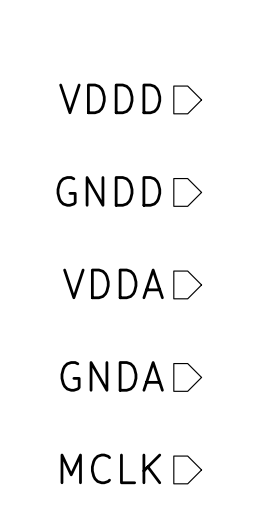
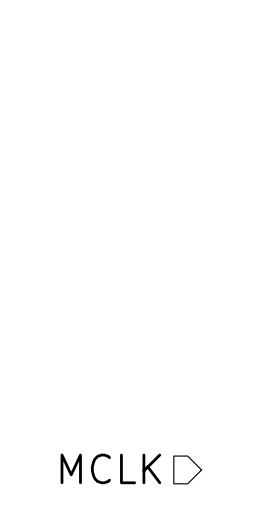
hierarchical label: VDDD (110, 98) -> none
hierarchical label: GNDD (108, 191) -> none
hierarchical label: VDDA (113, 283) -> none
hierarchical label: GNDA (112, 376) -> none

